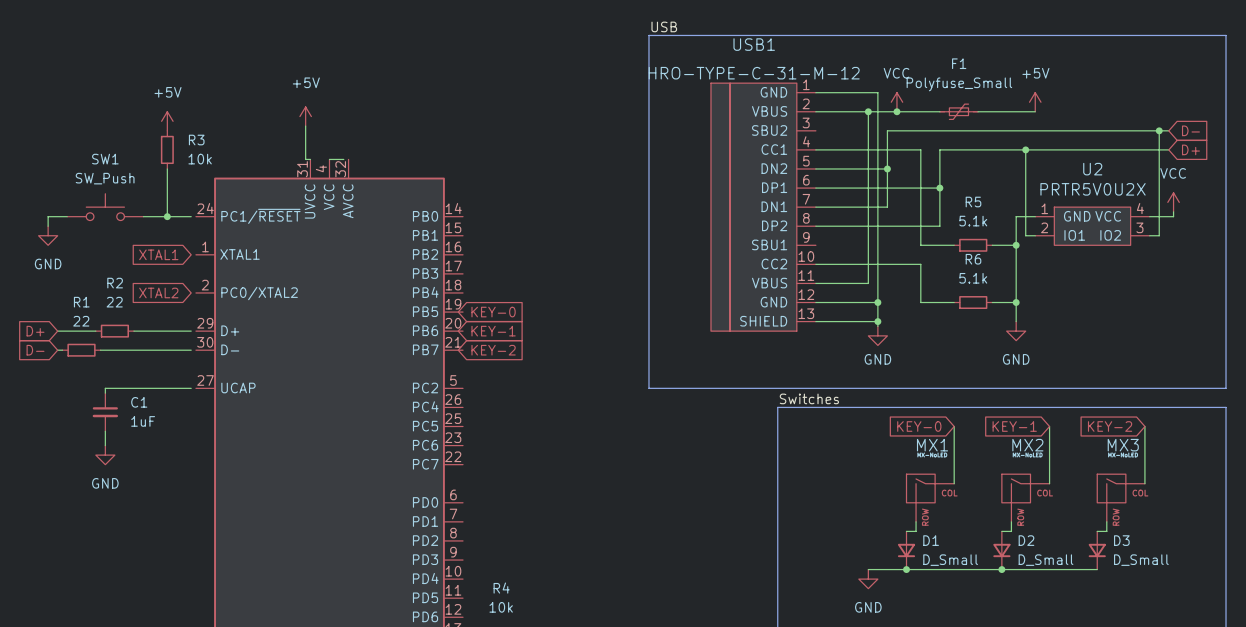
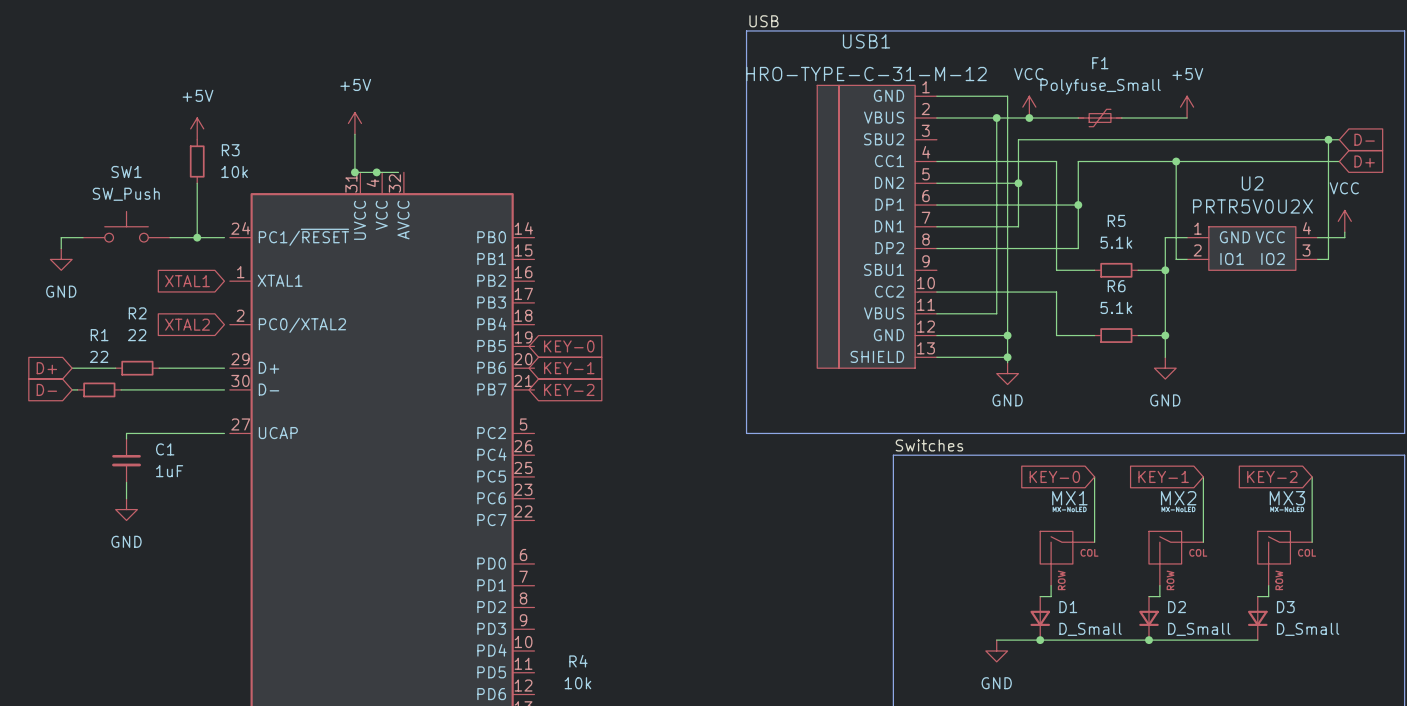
junction: none -> (354, 172)
wire: none -> (360, 172) (382, 172)
junction: none -> (376, 172)

